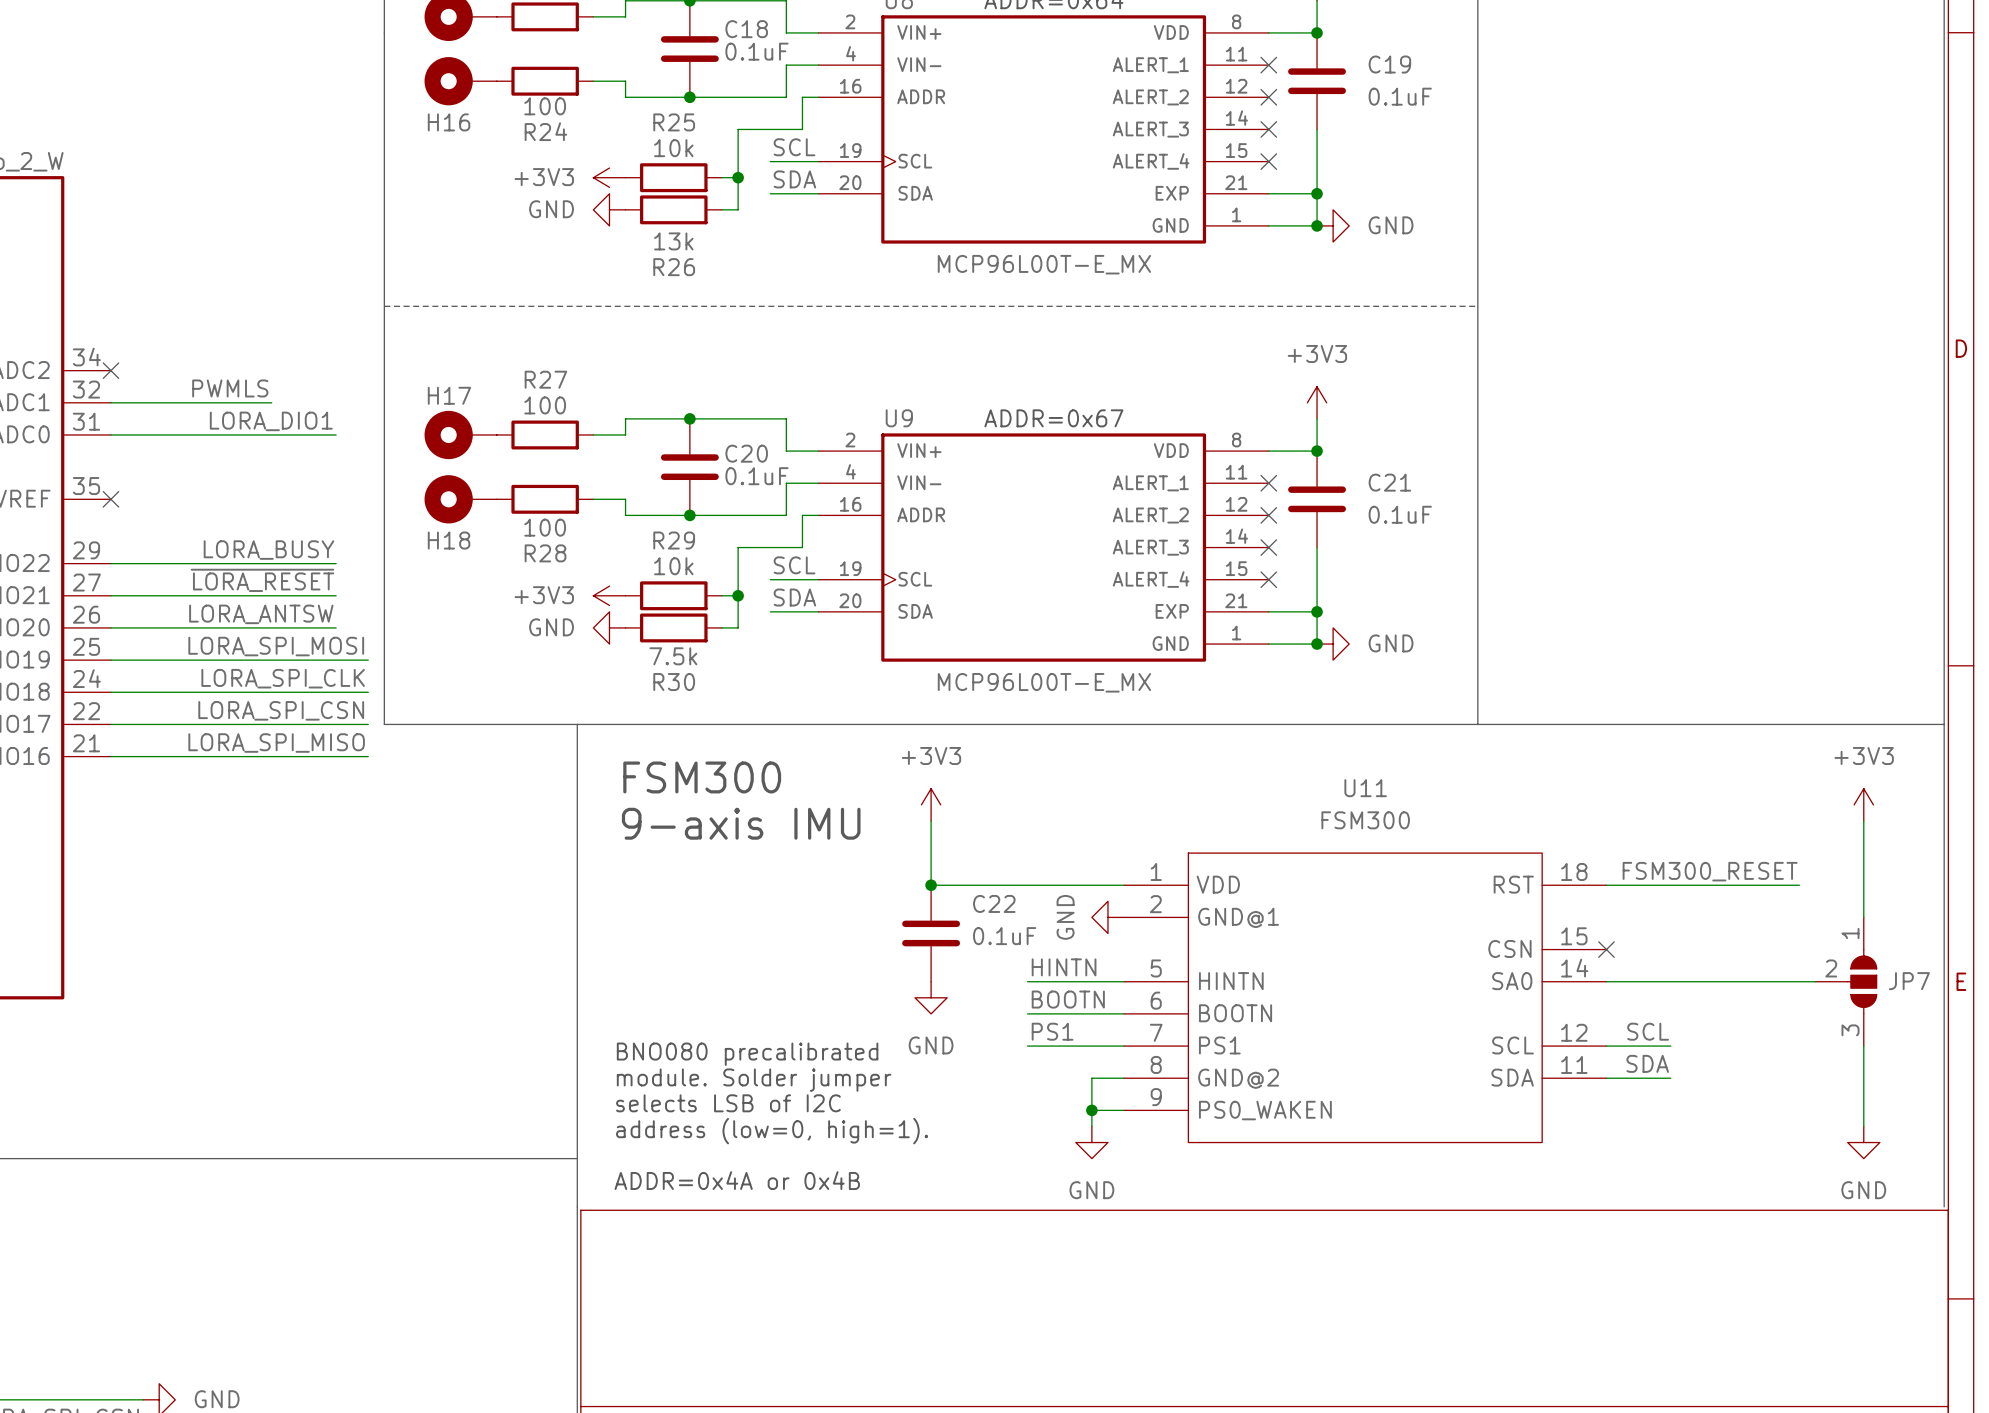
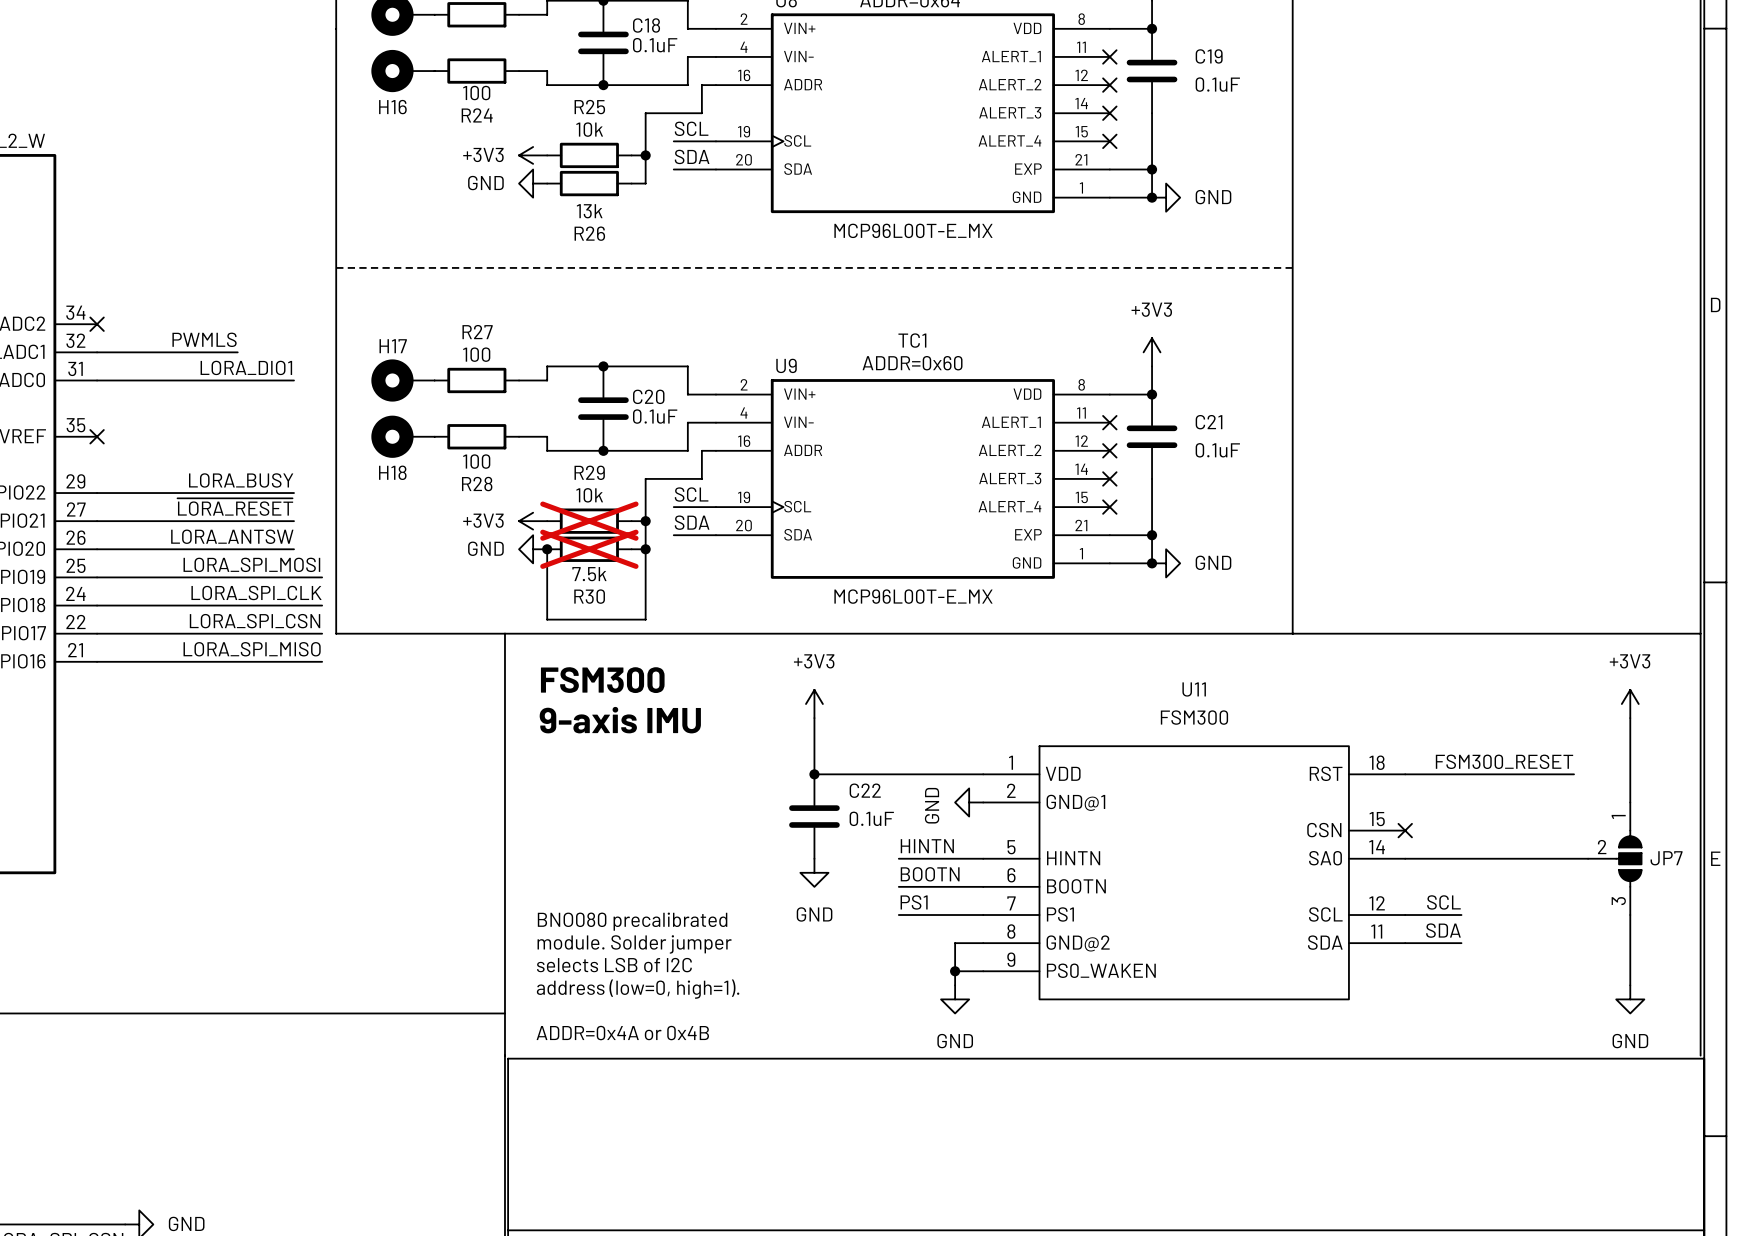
text: none -> TC1 (912, 340)
text: ADDR=0x67 (1053, 418) -> ADDR=0x60 (912, 363)
R29 do-not-place cross: none -> (589, 521)
wire: none -> (547, 549) (547, 619) (645, 619) (645, 549)
junction: none -> (547, 549)
R30 do-not-place cross: none -> (589, 549)
junction: none -> (645, 549)

